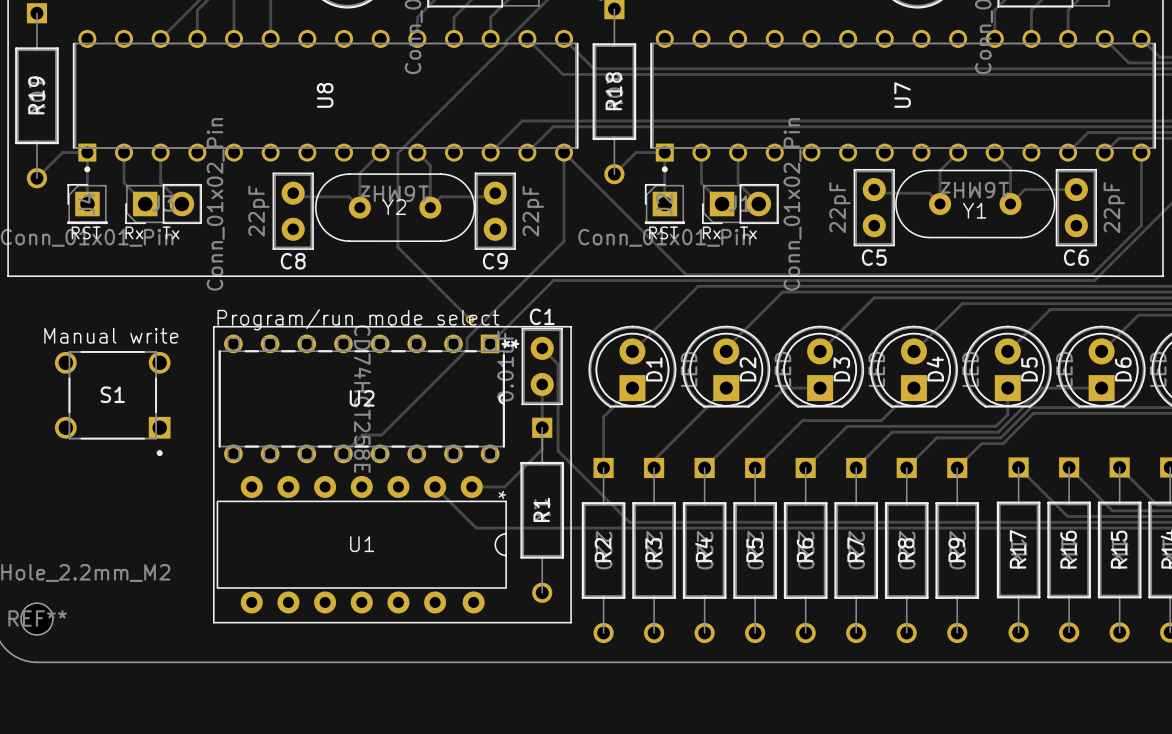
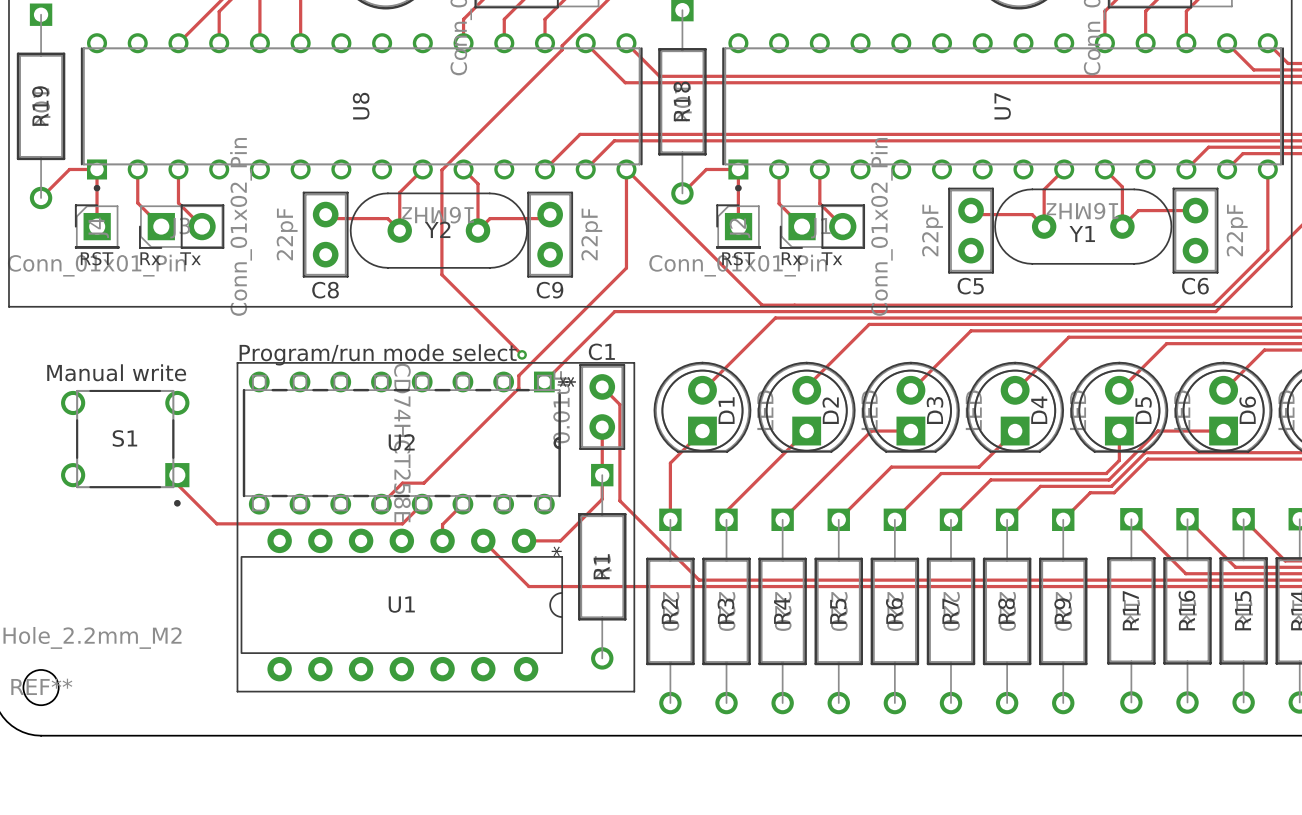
track: none -> (177, 475) (177, 484) (216, 523) (402, 523) (422, 504)
track: none -> (462, 504) (442, 524) (442, 551)

